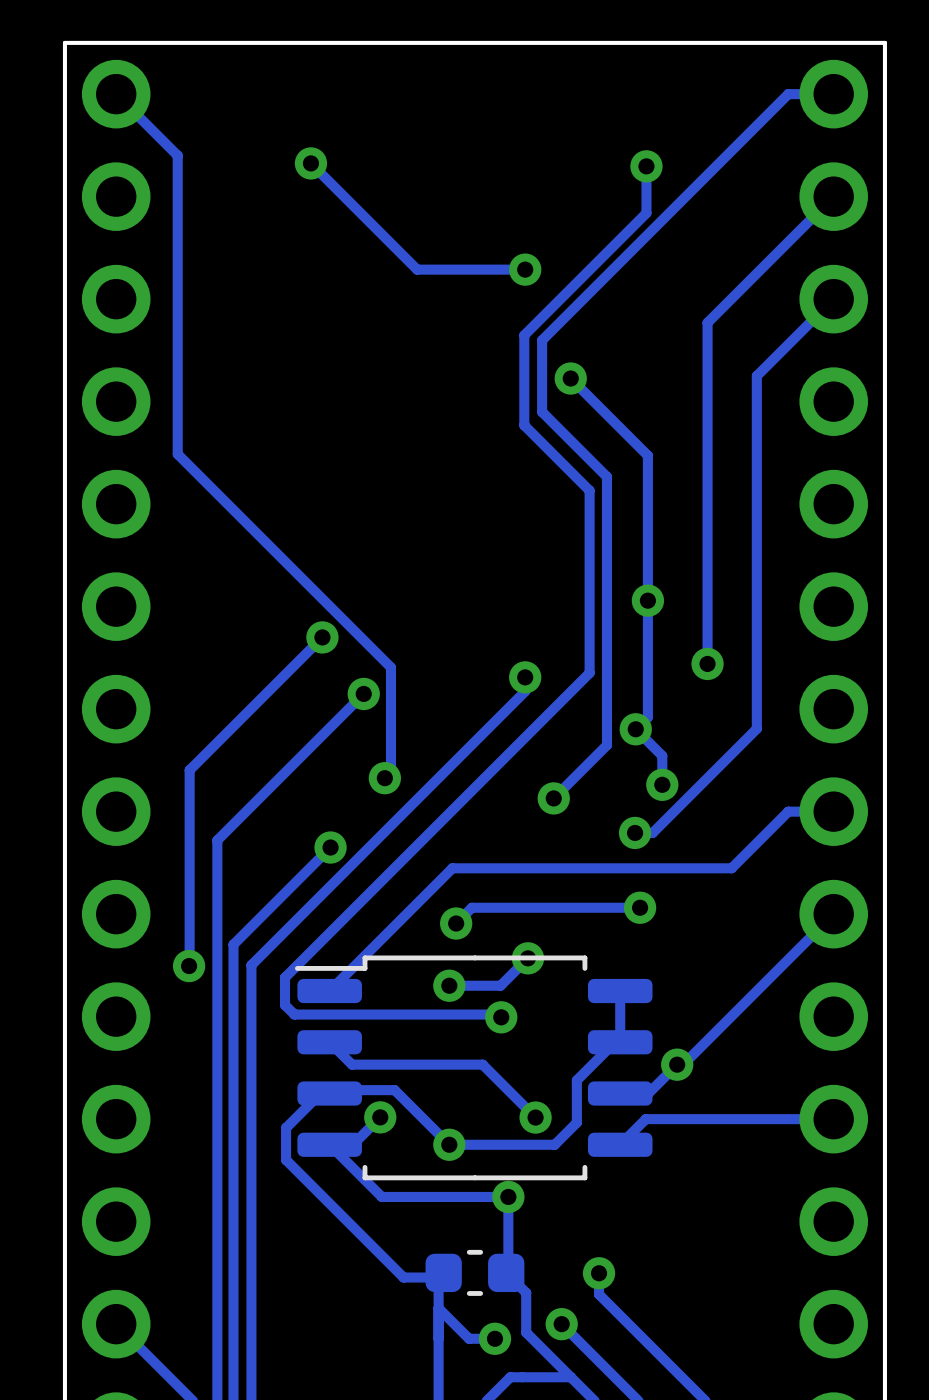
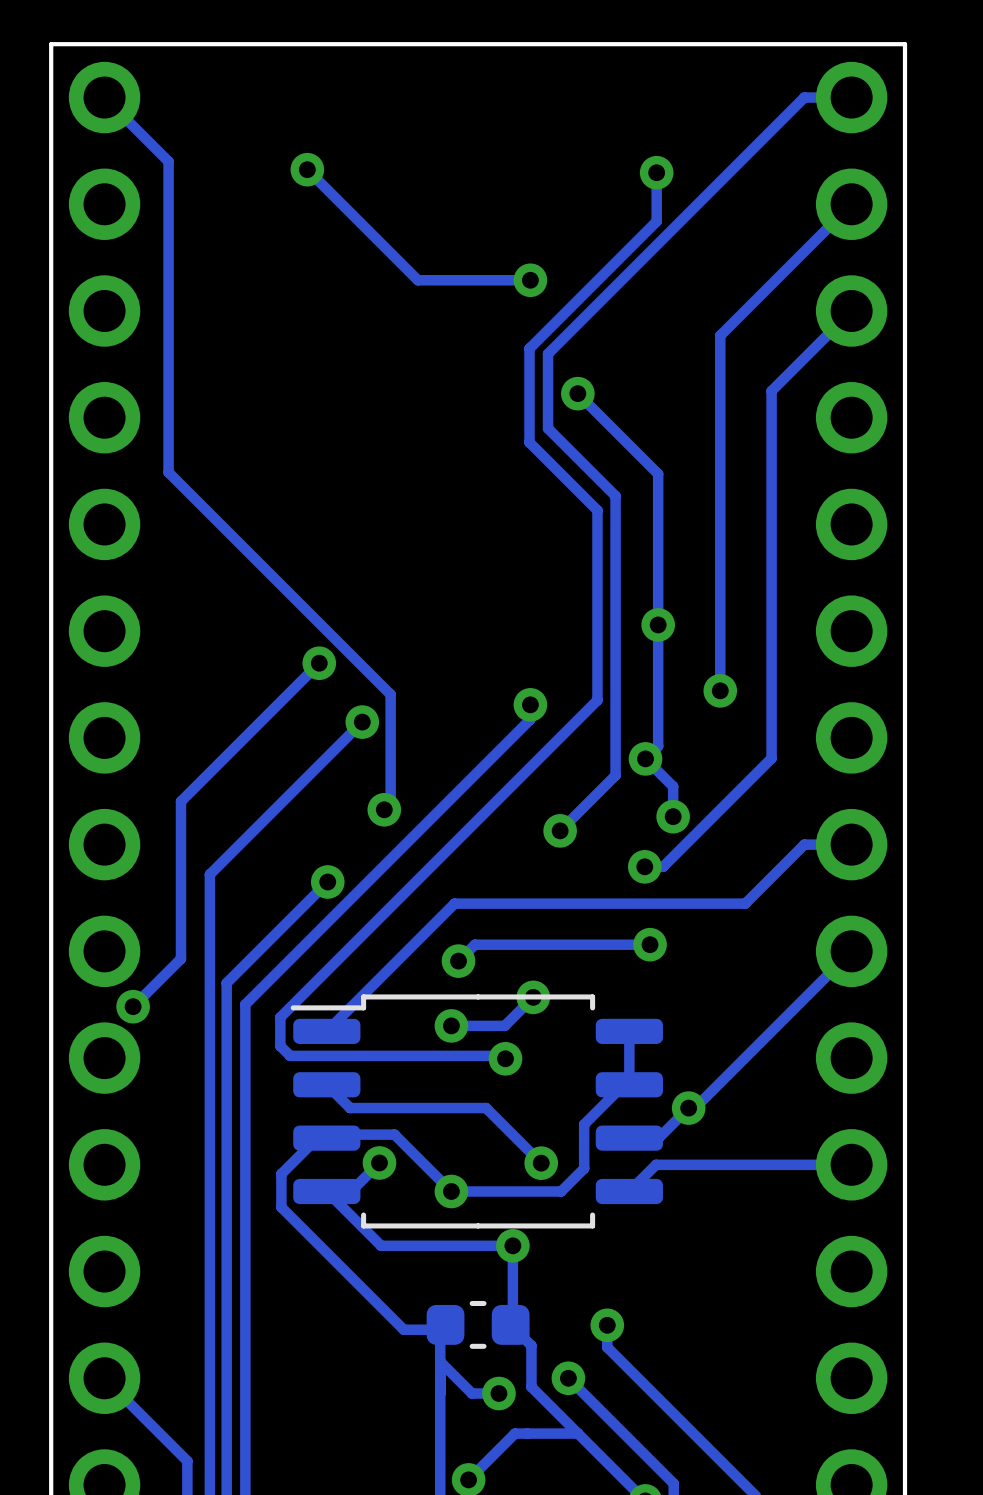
track: (189, 921) (189, 965) -> (181, 958) (133, 1006)
via position: (189, 966) -> (133, 1006)

